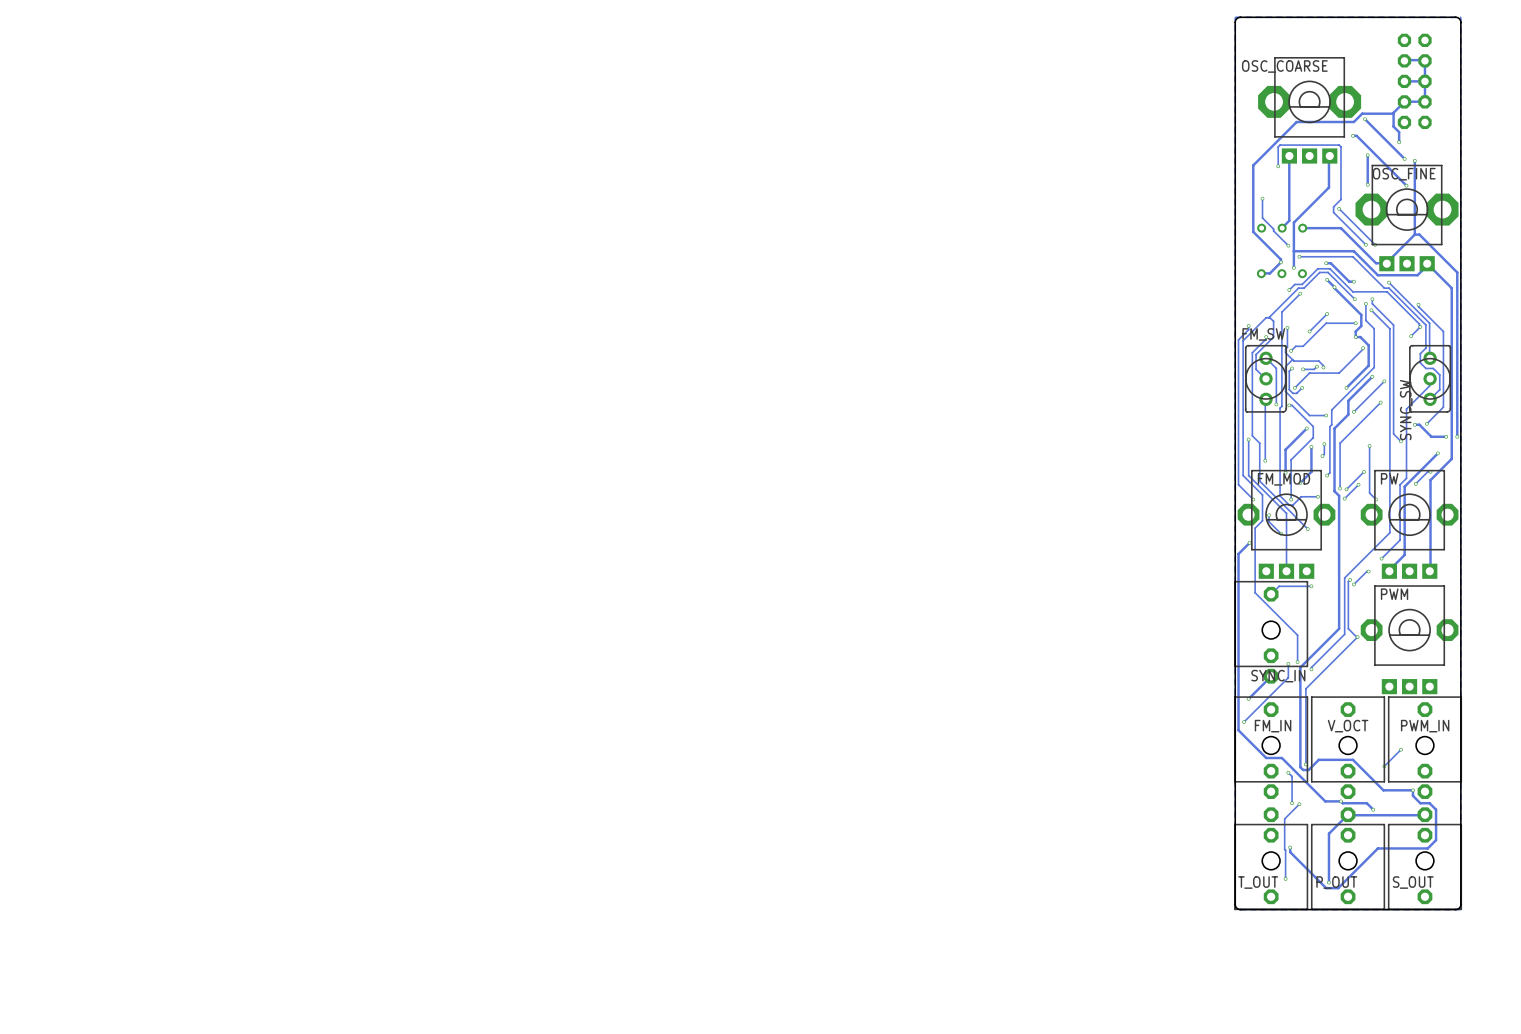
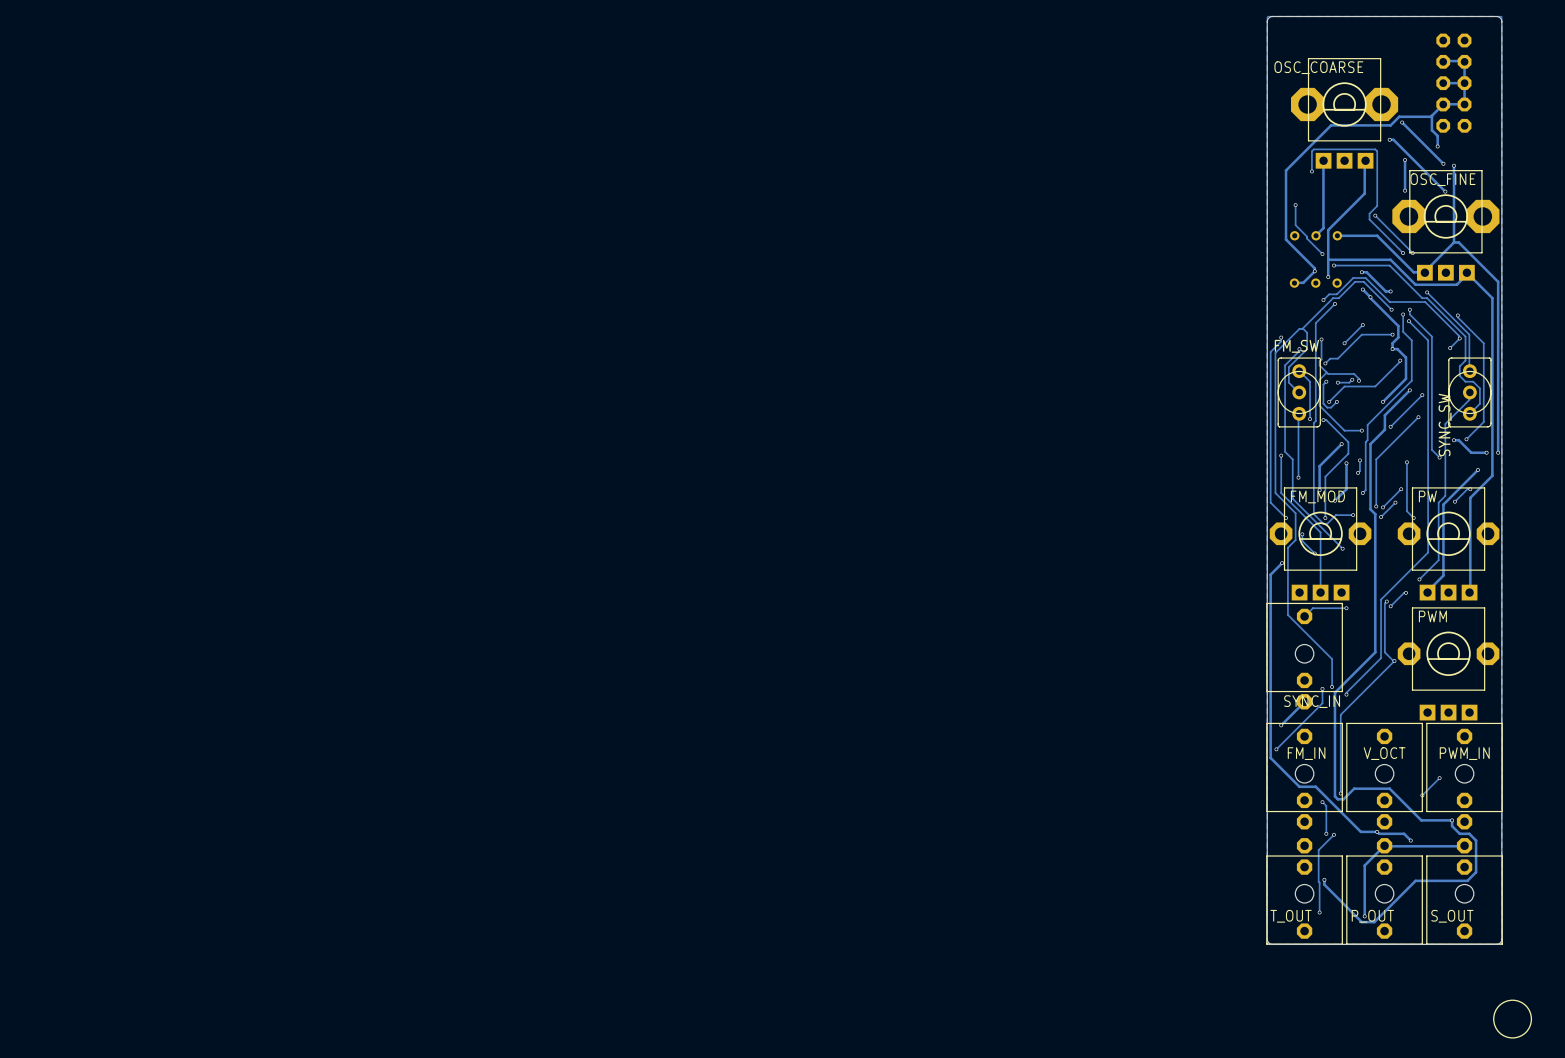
drawing: none -> [1493, 999, 1533, 1039]

